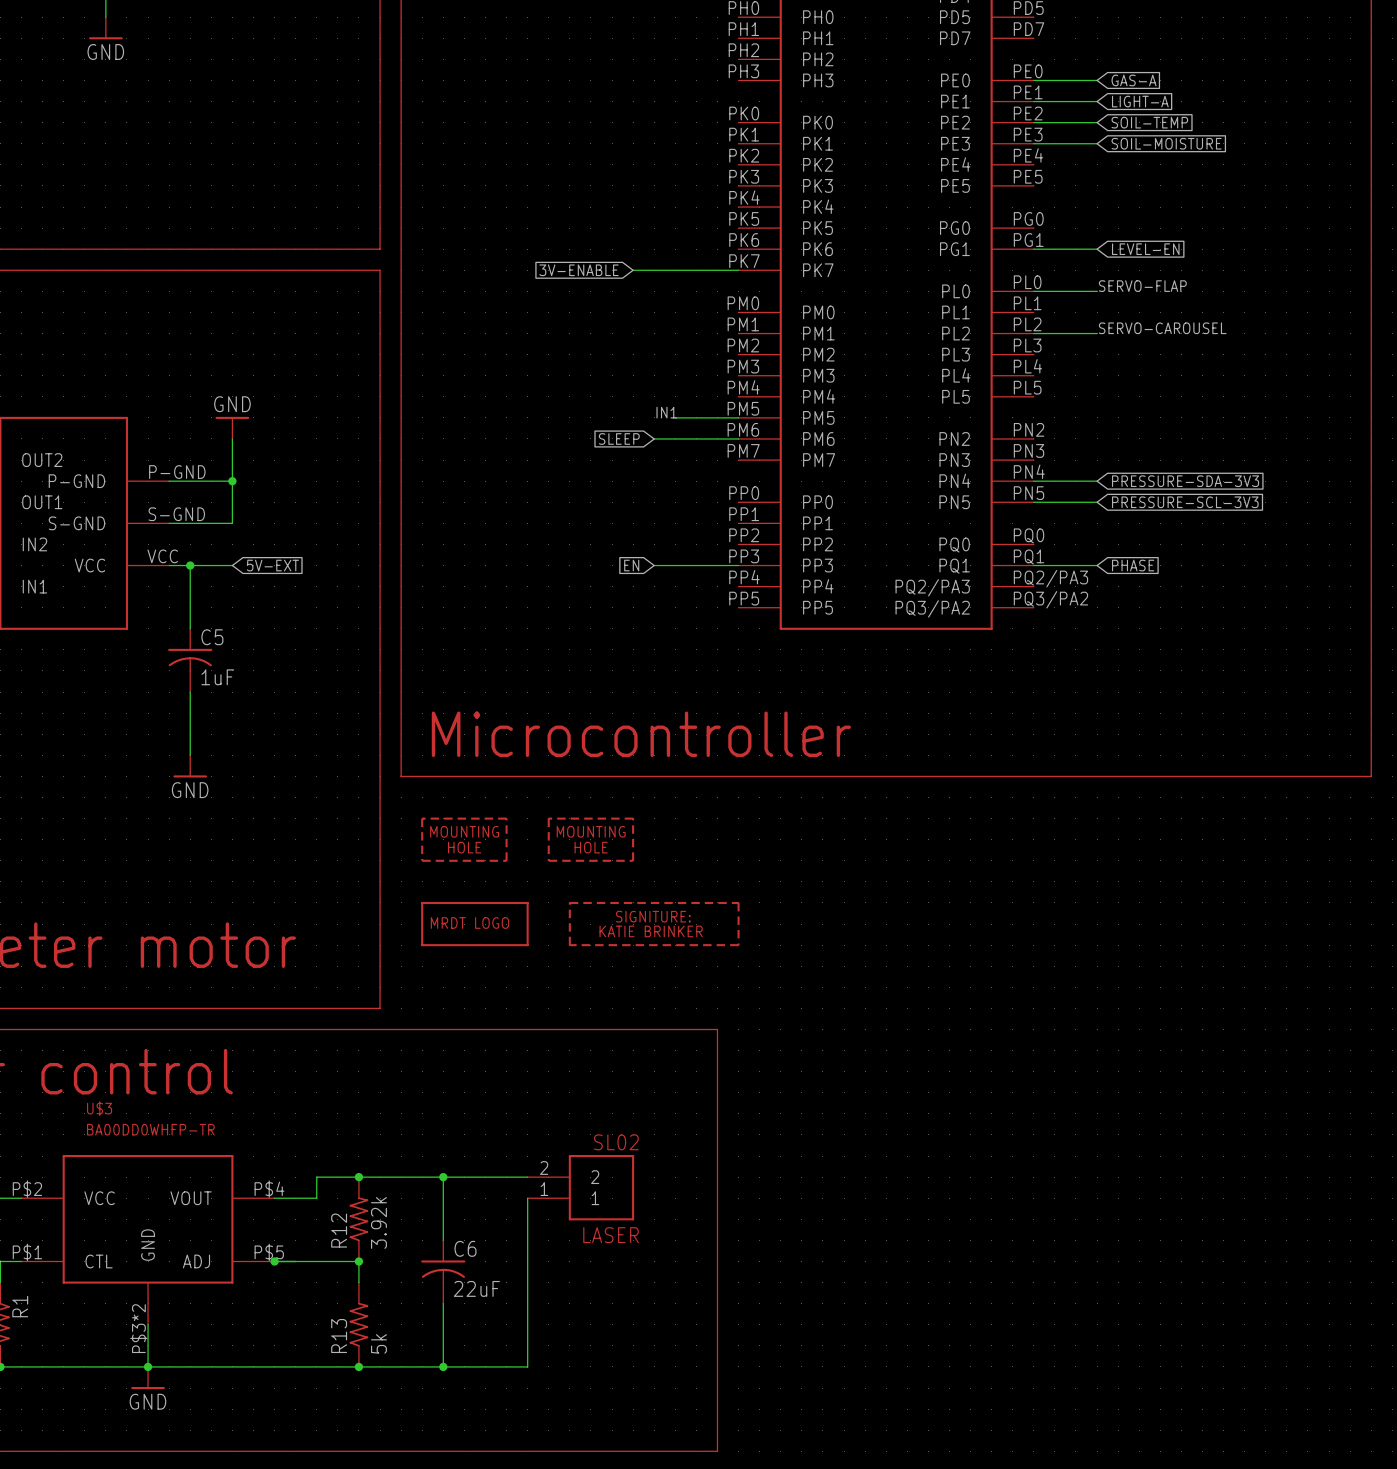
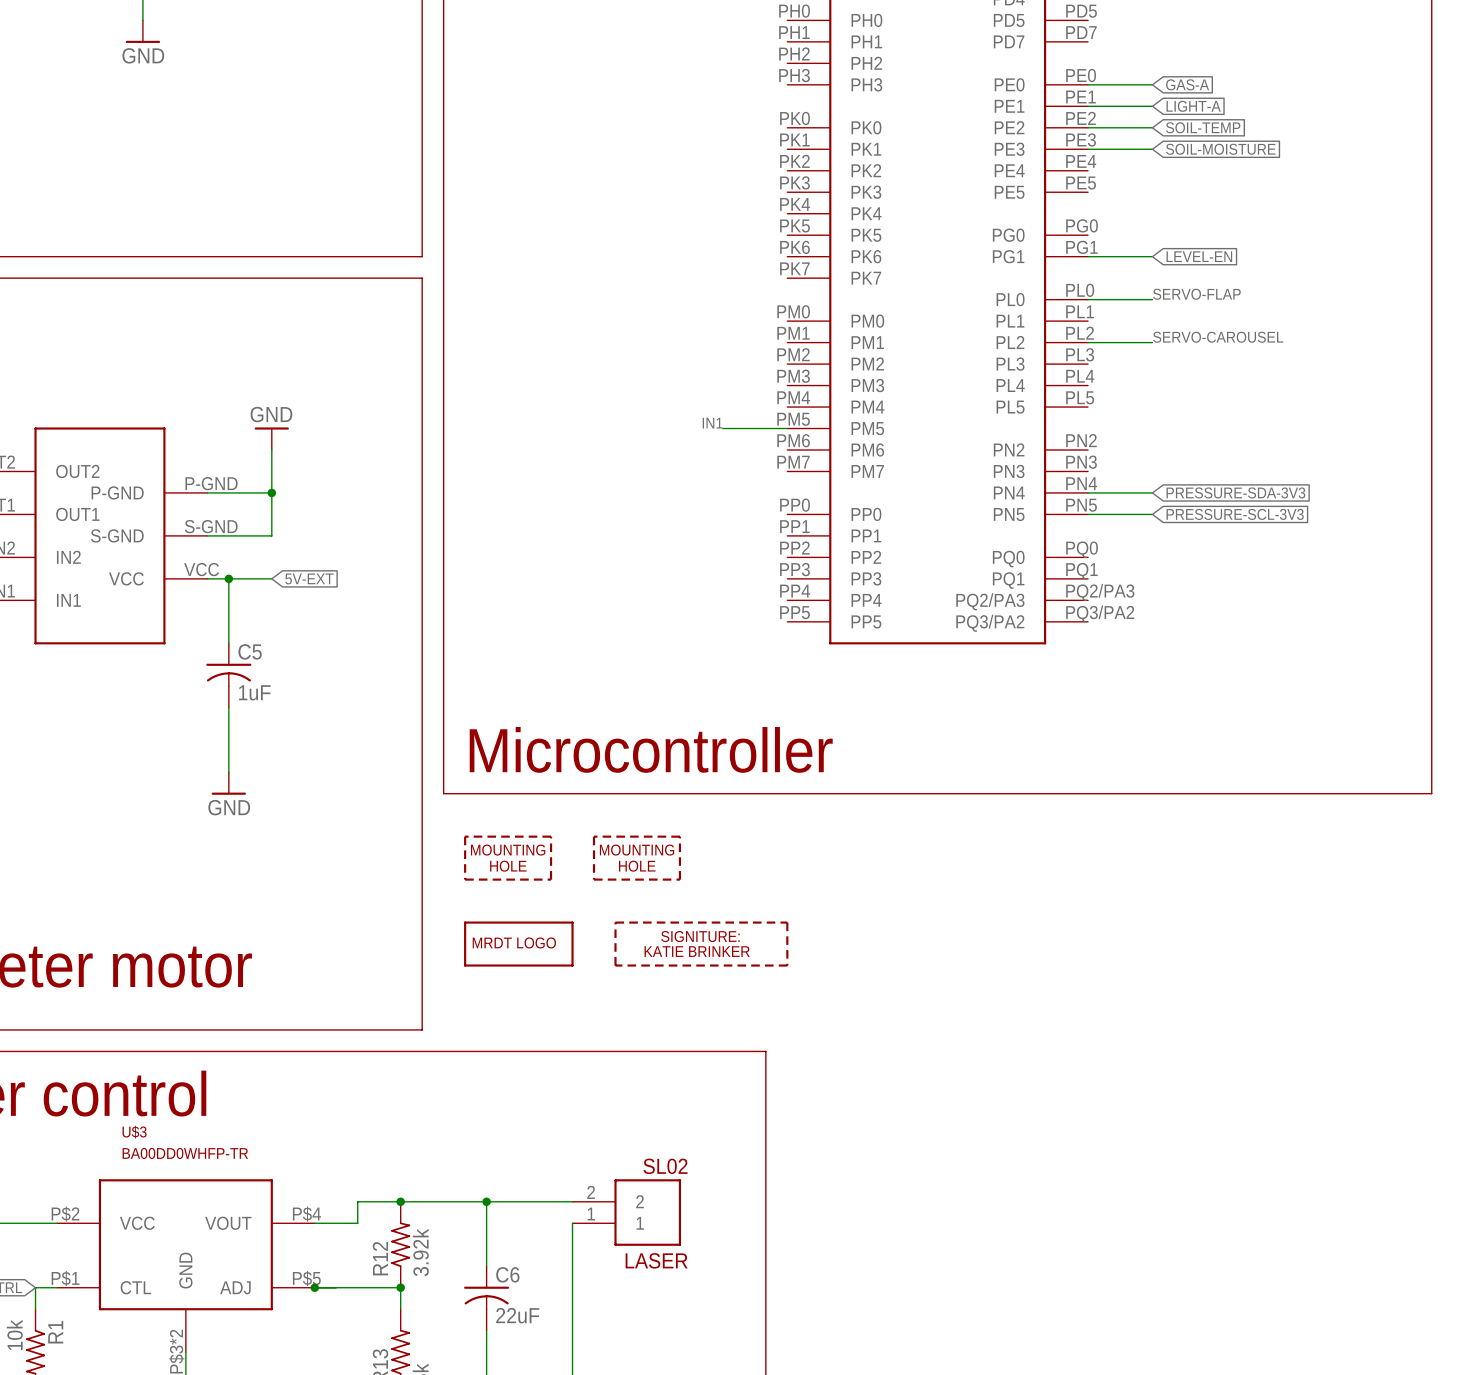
global label: 3V-ENABLE (579, 270) -> none
wire: (633, 270) (738, 270) -> none
global label: SLEEP (619, 438) -> none
wire: (654, 438) (738, 438) -> none
global label: EN (631, 565) -> none
wire: (654, 565) (738, 565) -> none
wire: (1033, 565) (1097, 565) -> none
global label: PHASE (1133, 565) -> none

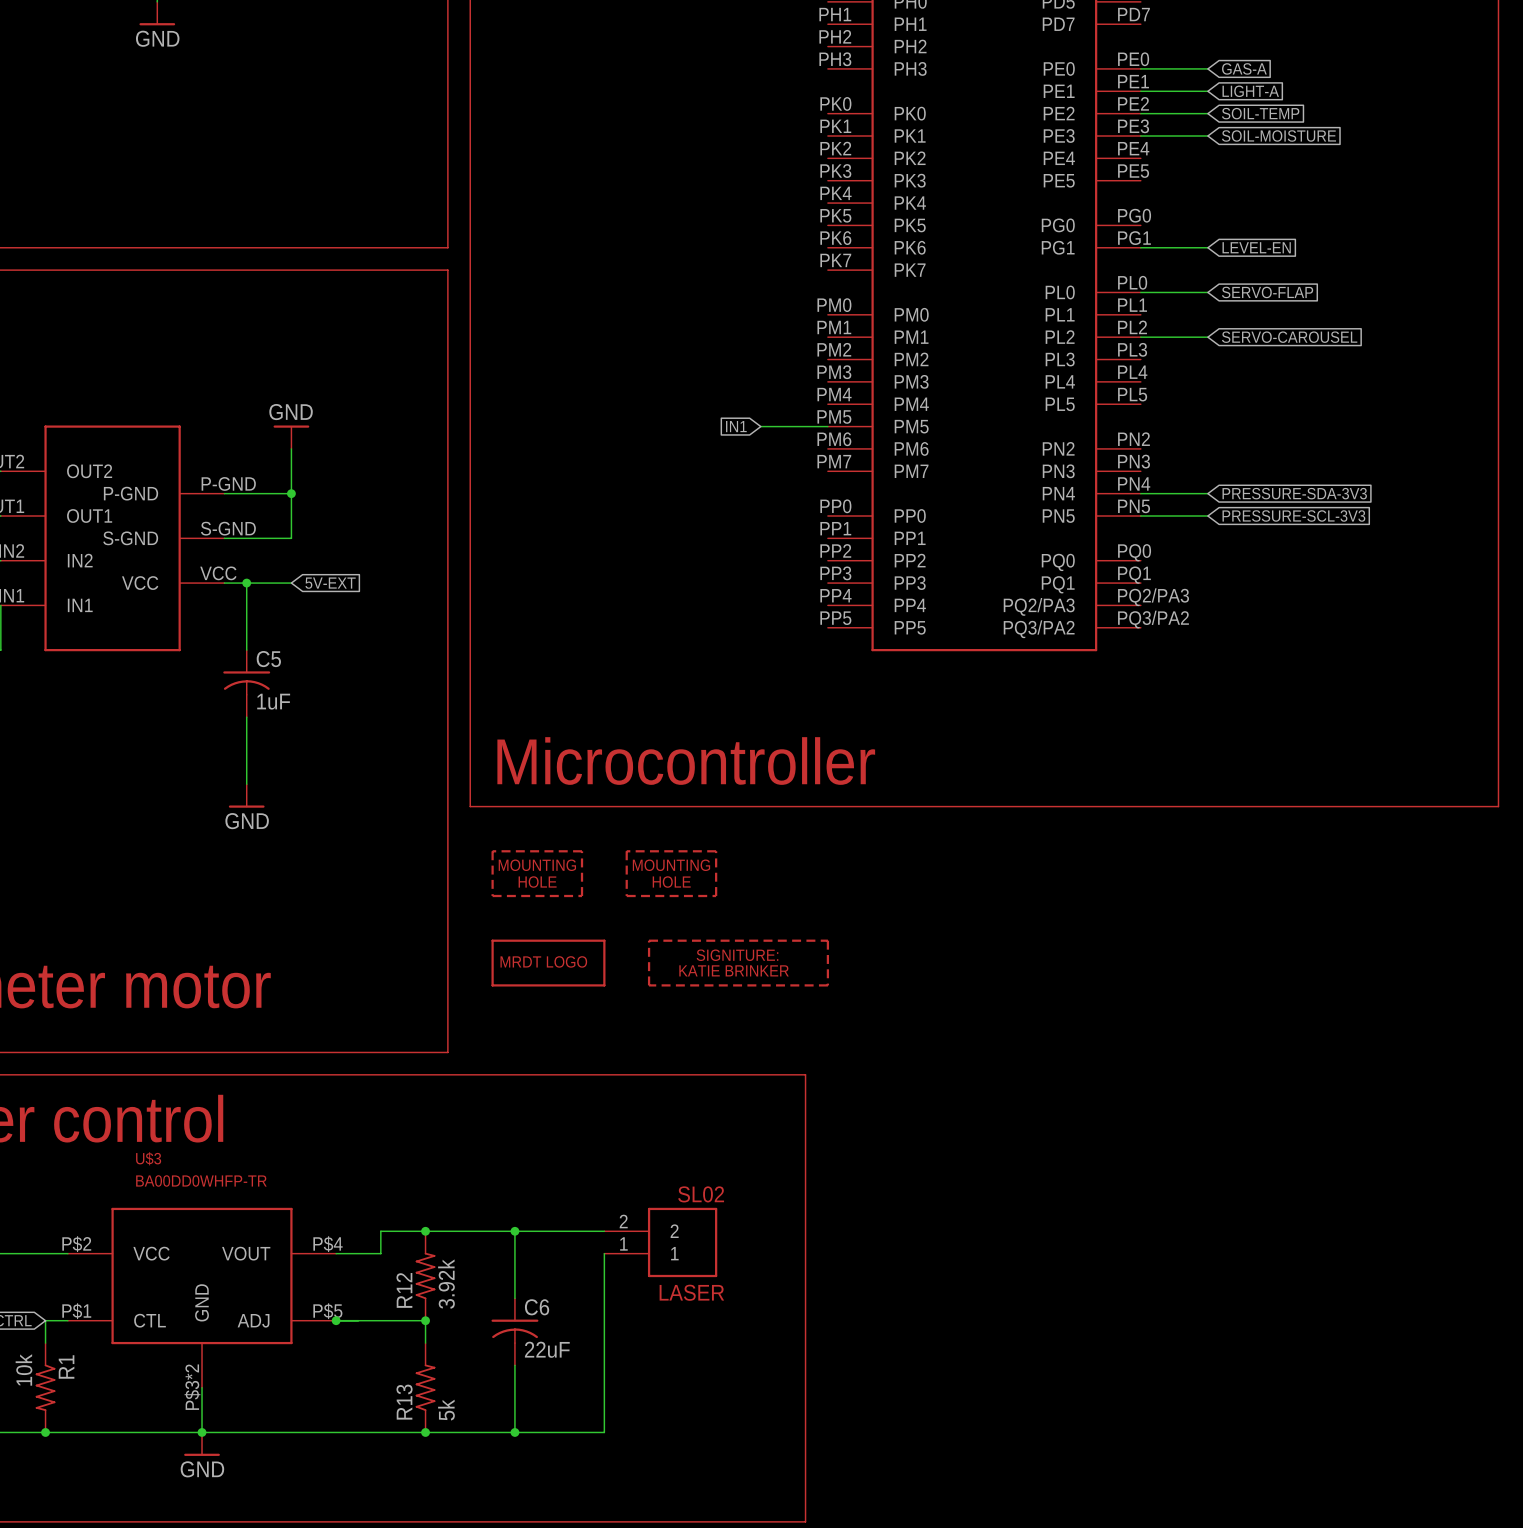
label: SERVO-FLAP (1196, 294) -> none
global label: none -> SERVO-FLAP (1267, 292)
label: SERVO-CAROUSEL (1218, 337) -> none
global label: none -> SERVO-CAROUSEL (1289, 337)
label: IN1 (712, 423) -> none
global label: none -> IN1 (736, 426)

